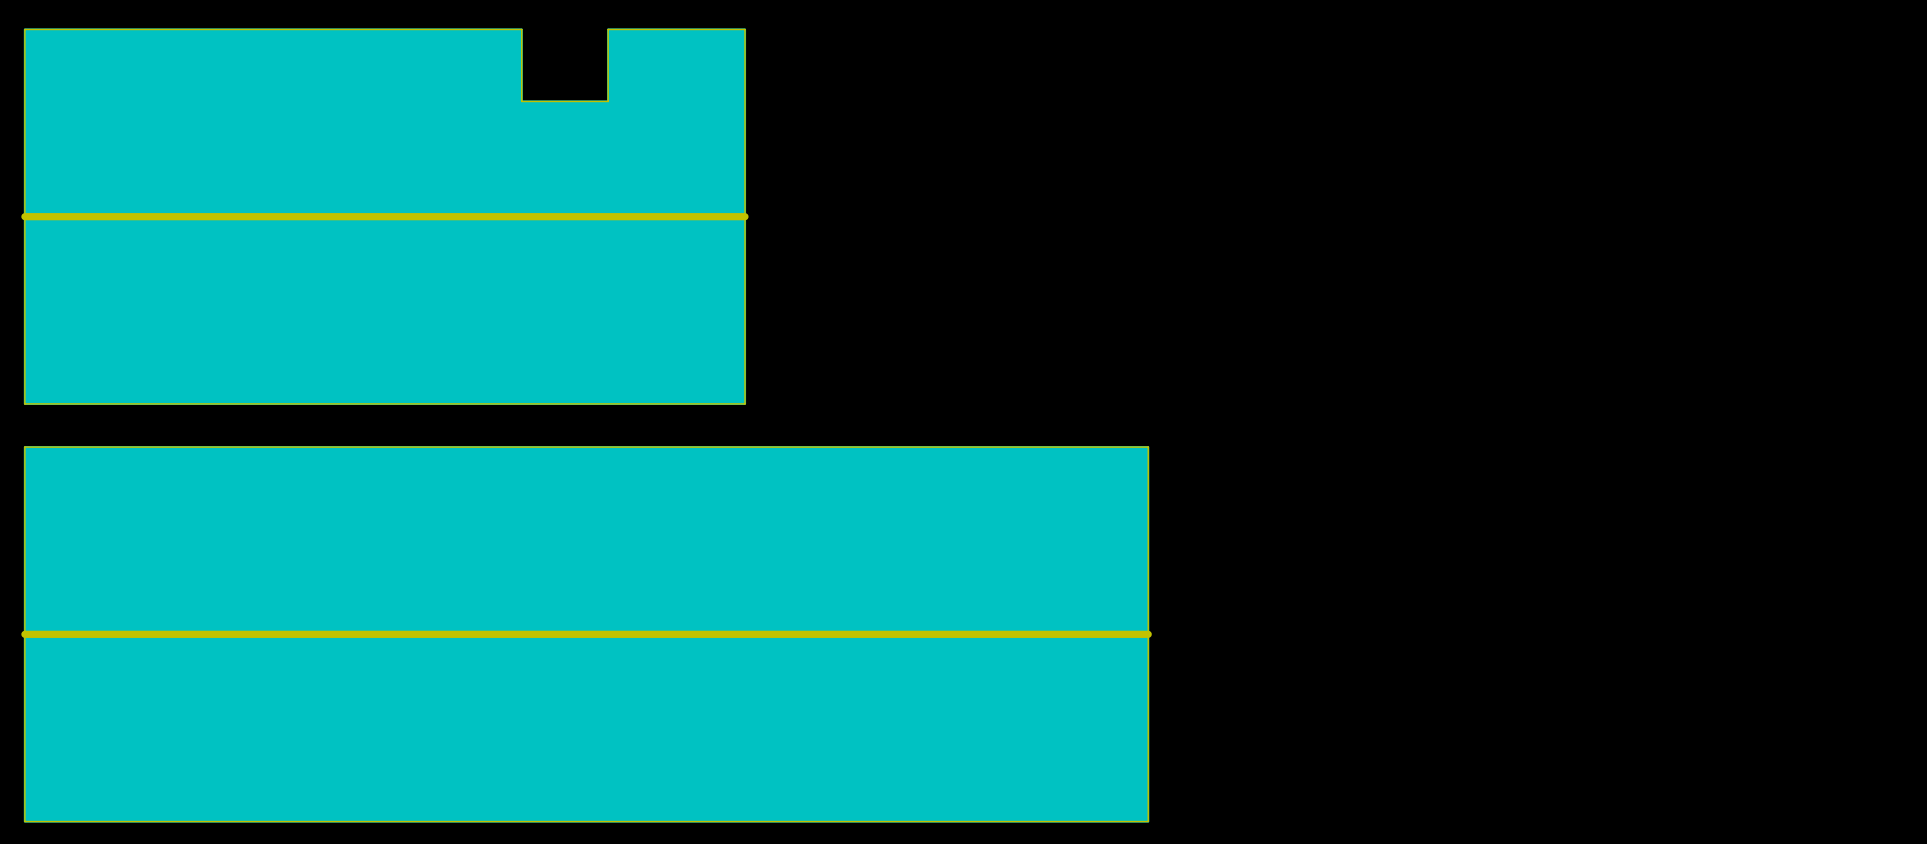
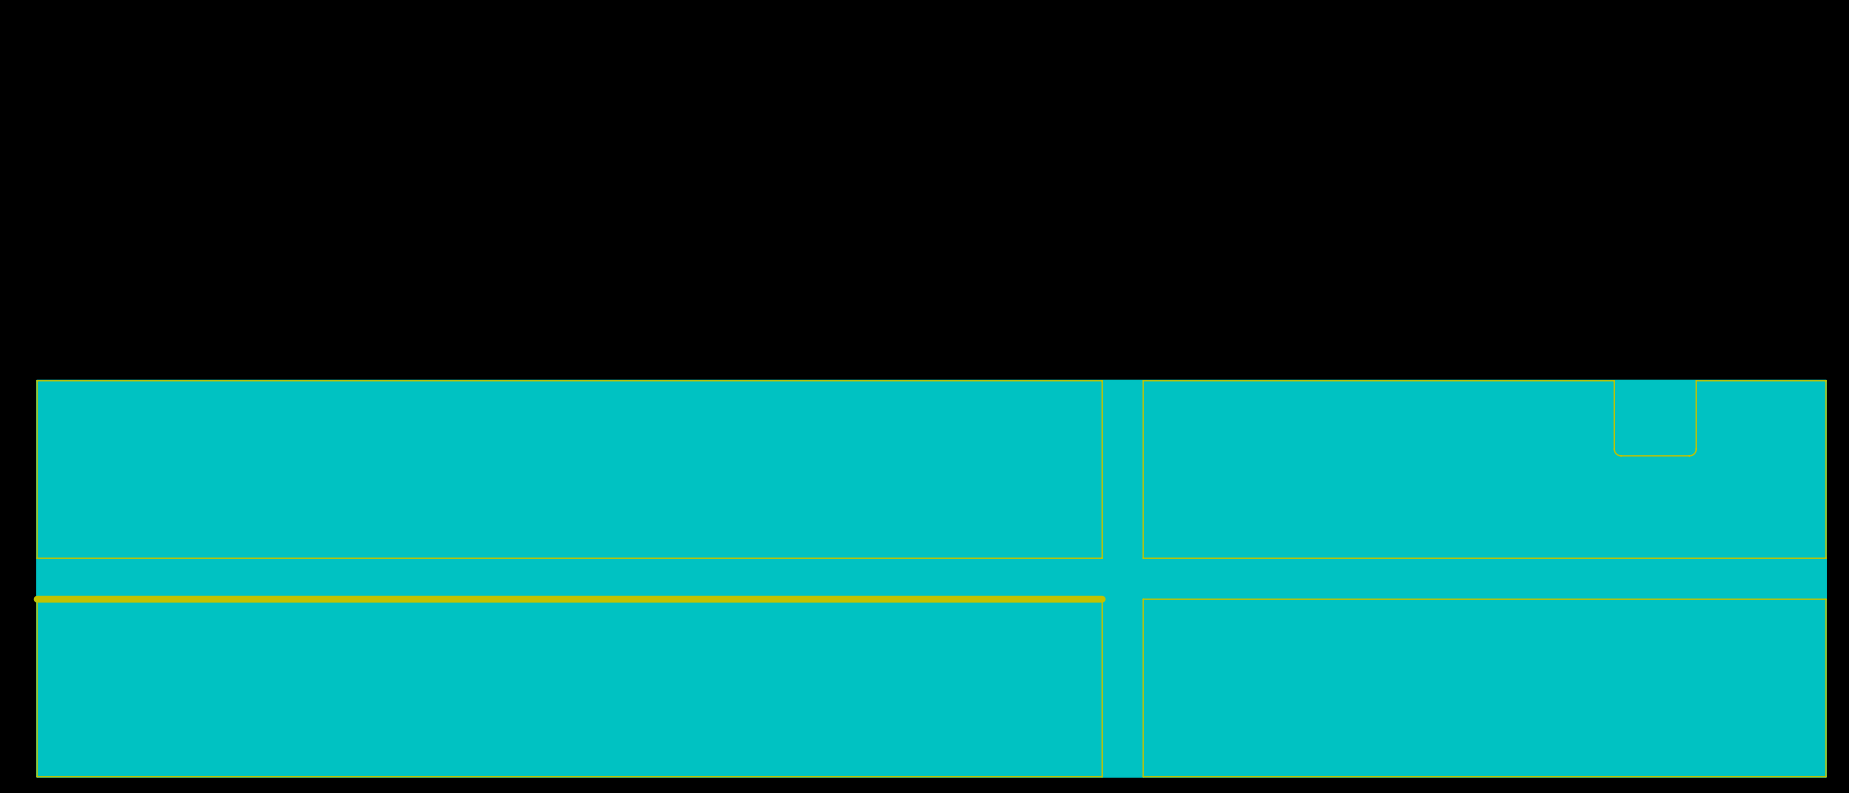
drawing: [23, 28, 747, 405] -> none
board edge: (24, 216) (744, 216) -> none
drawing: none -> [36, 379, 1827, 778]
board edge: (24, 403) (24, 29) (521, 29) (521, 101) (608, 101) (608, 29) (744, 29) (744, 403) -> (37, 380) (37, 421)
board edge: none -> (1143, 380) (1614, 380) (1614, 449) (1616, 454) (1621, 455) (1689, 455) (1694, 453) (1696, 449) (1696, 380) (1825, 380) (1825, 558) (1143, 558) (1143, 380)
drawing: [23, 446, 1150, 823] -> none
board edge: (24, 447) (1148, 447) -> (719, 380) (1102, 380) (1102, 421)
board edge: (24, 591) (24, 634) -> (37, 558) (1102, 558)
board edge: (1148, 591) (1148, 634) -> none
board edge: none -> (1143, 599) (1825, 599) (1825, 776) (1143, 776) (1143, 599)

